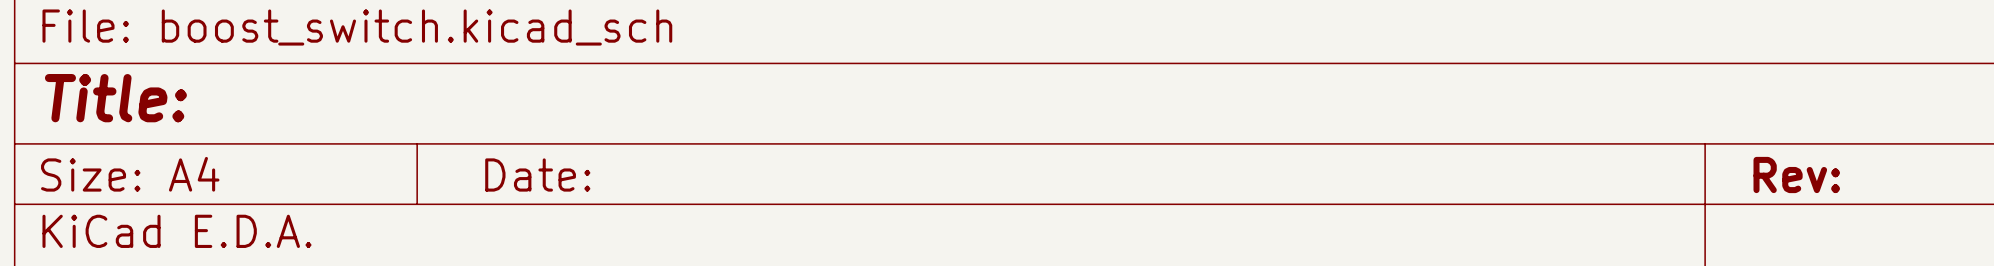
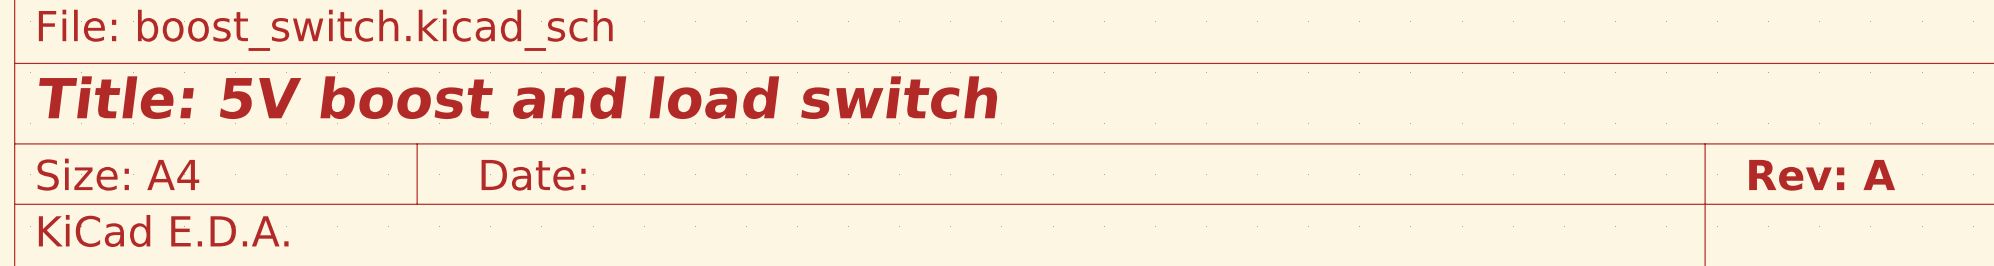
title block: Title: (115, 98) -> Title: 5V boost and load switch (518, 97)
title block: Rev: (1796, 175) -> Rev: A (1822, 175)

